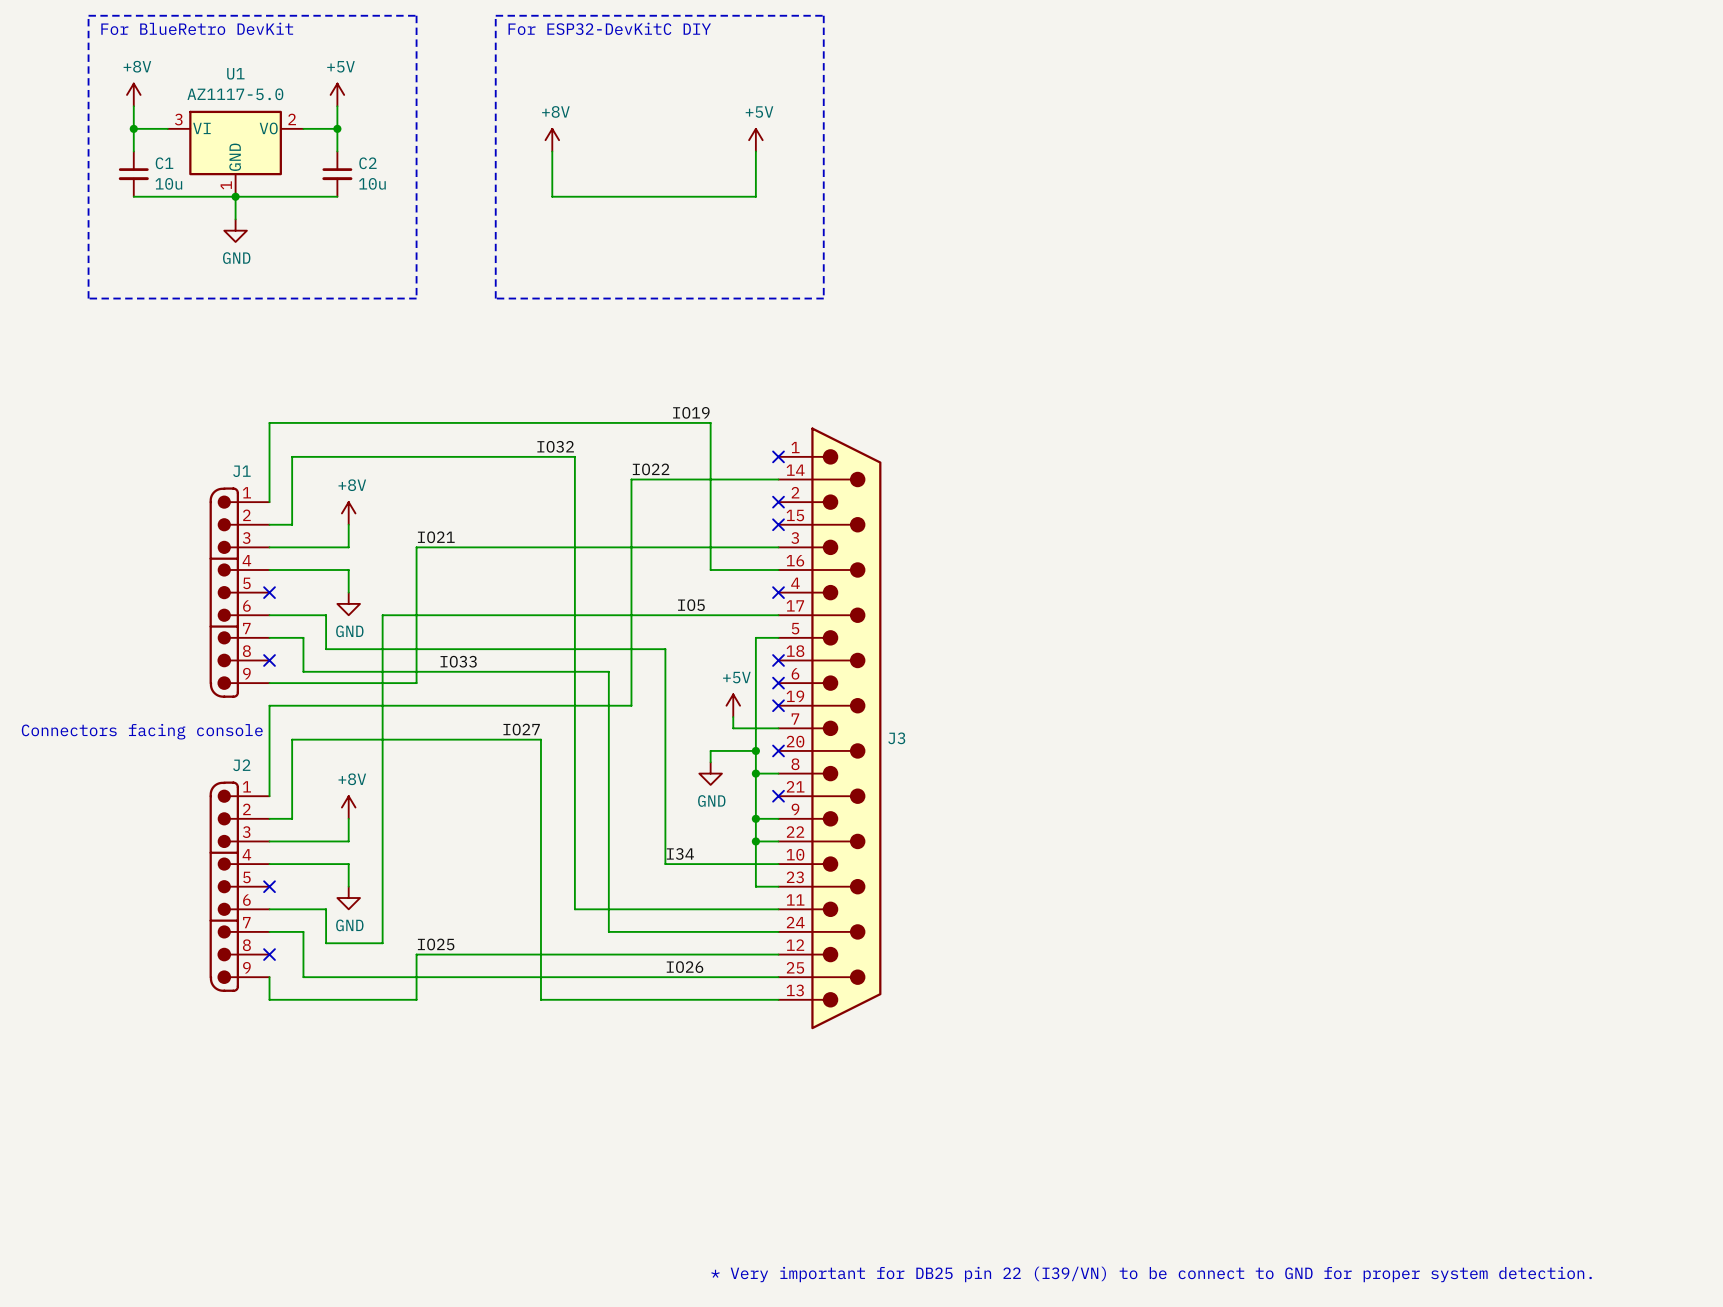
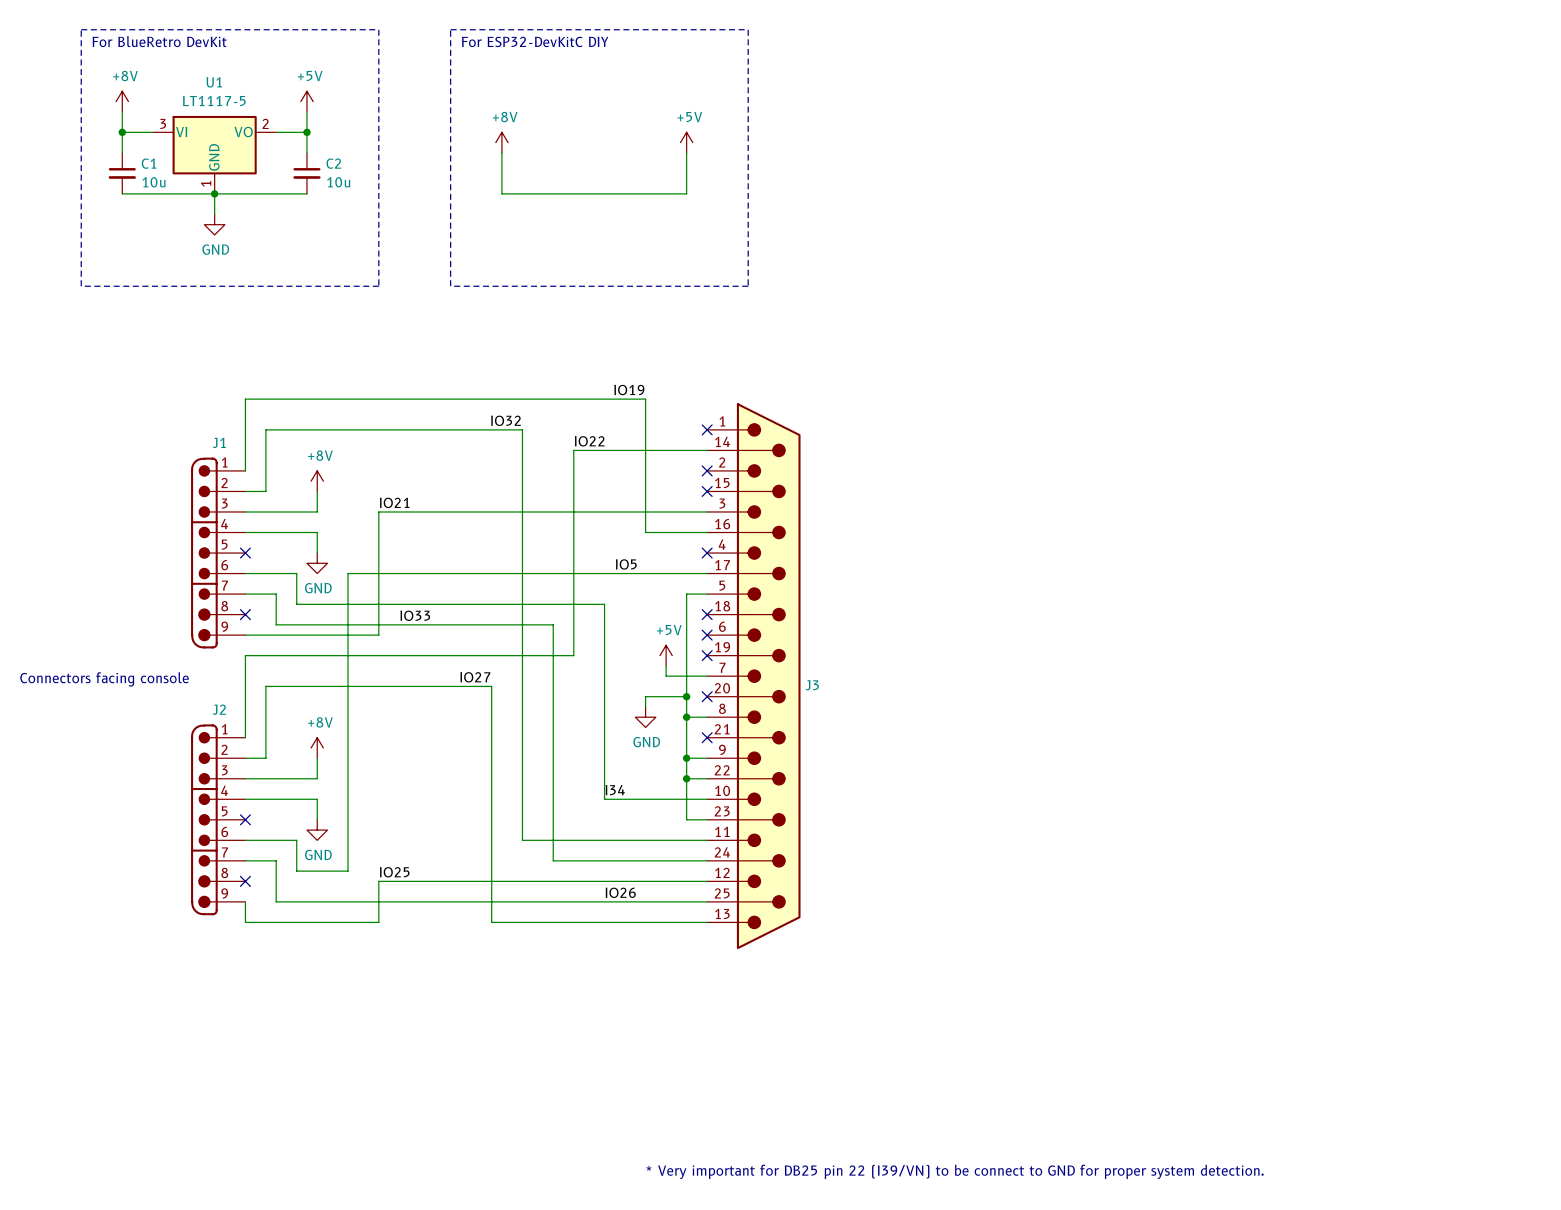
U1 value: AZ1117-5.0 (235, 94) -> LT1117-5 (214, 100)

